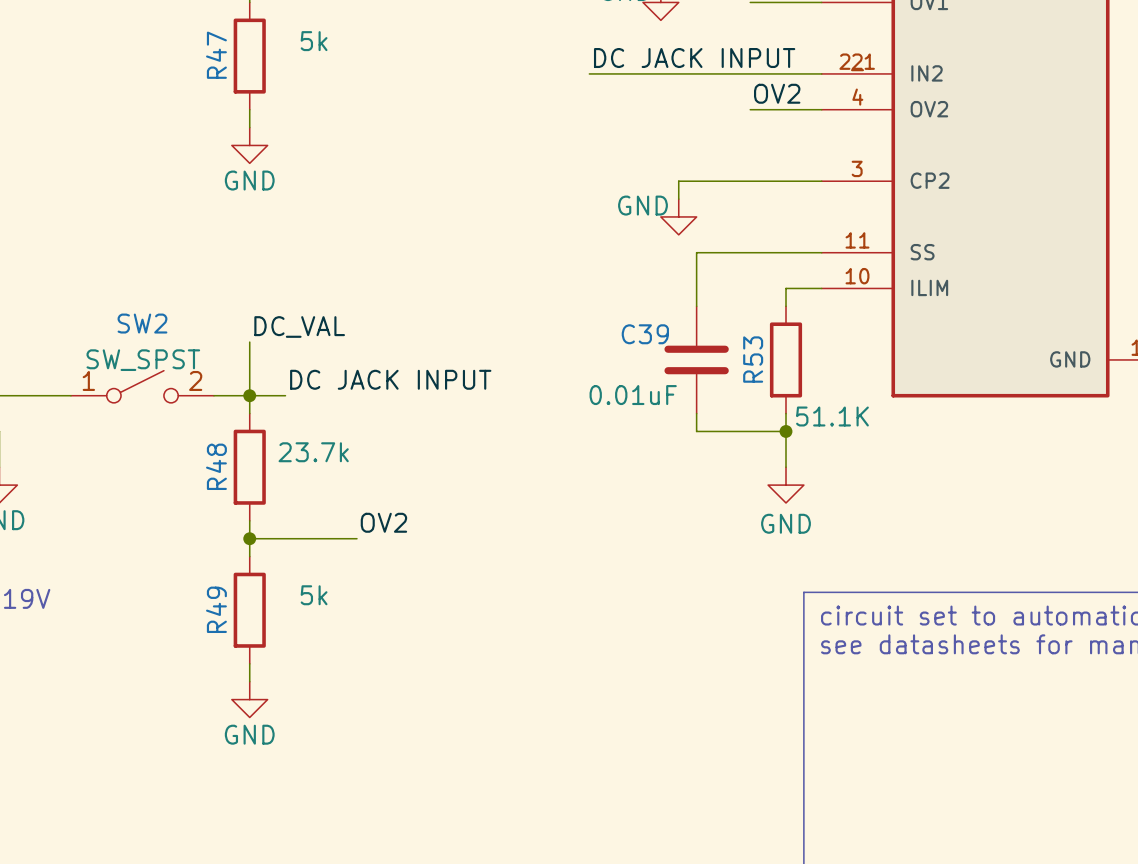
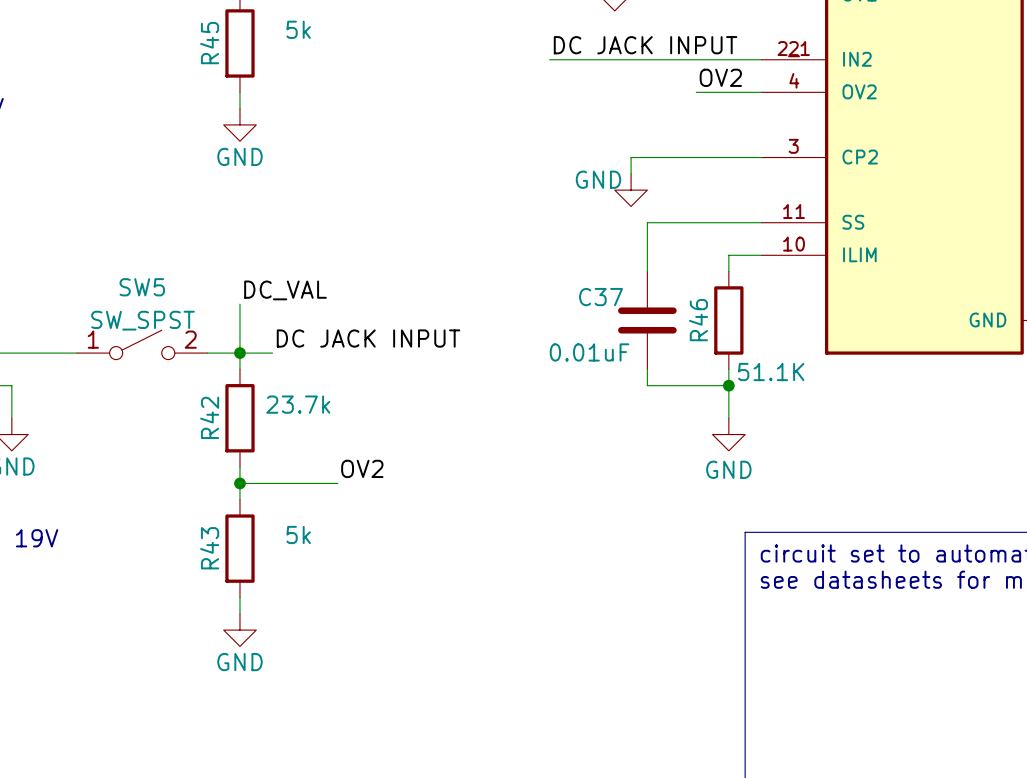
R47 name: R47 (216, 55) -> R45 (209, 43)
SW2 name: SW2 (142, 323) -> SW5 (142, 287)
C39 name: C39 (645, 334) -> C37 (601, 297)
R53 name: R53 (753, 359) -> R46 (698, 320)
R48 name: R48 (216, 466) -> R42 (209, 417)
R49 name: R49 (216, 609) -> R43 (209, 548)

